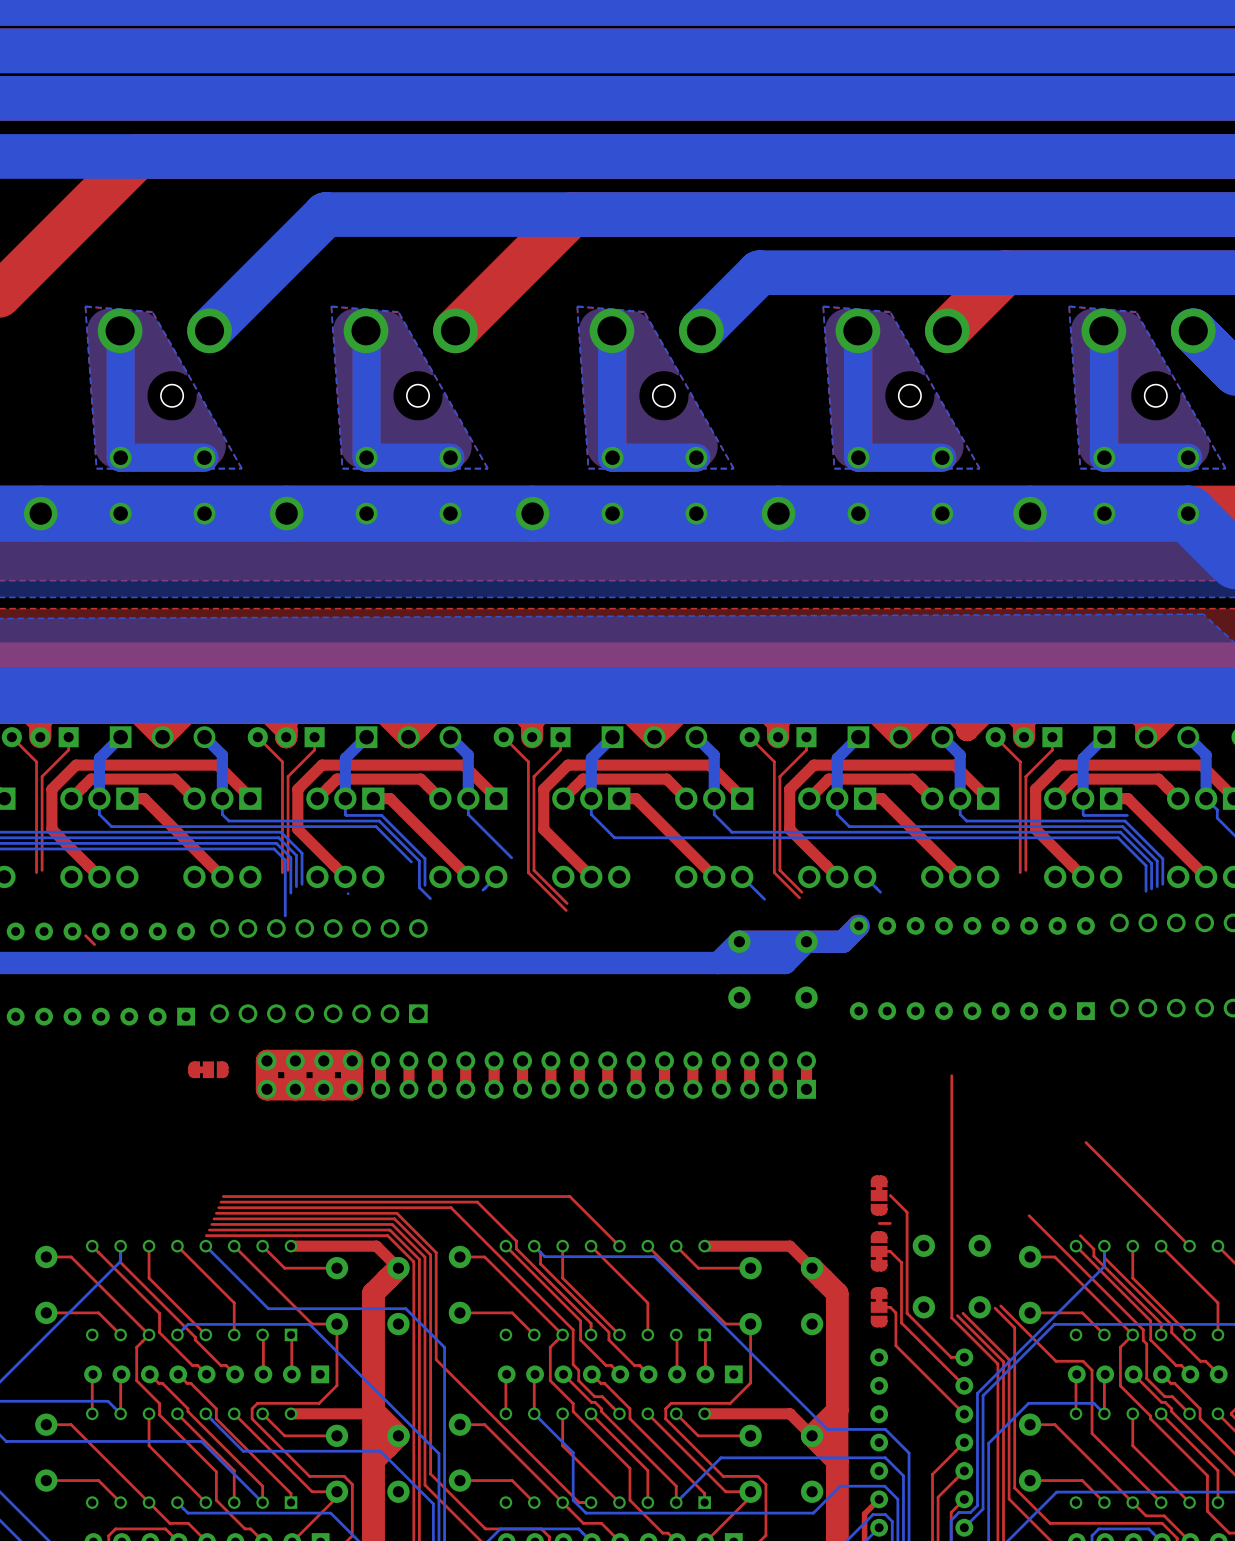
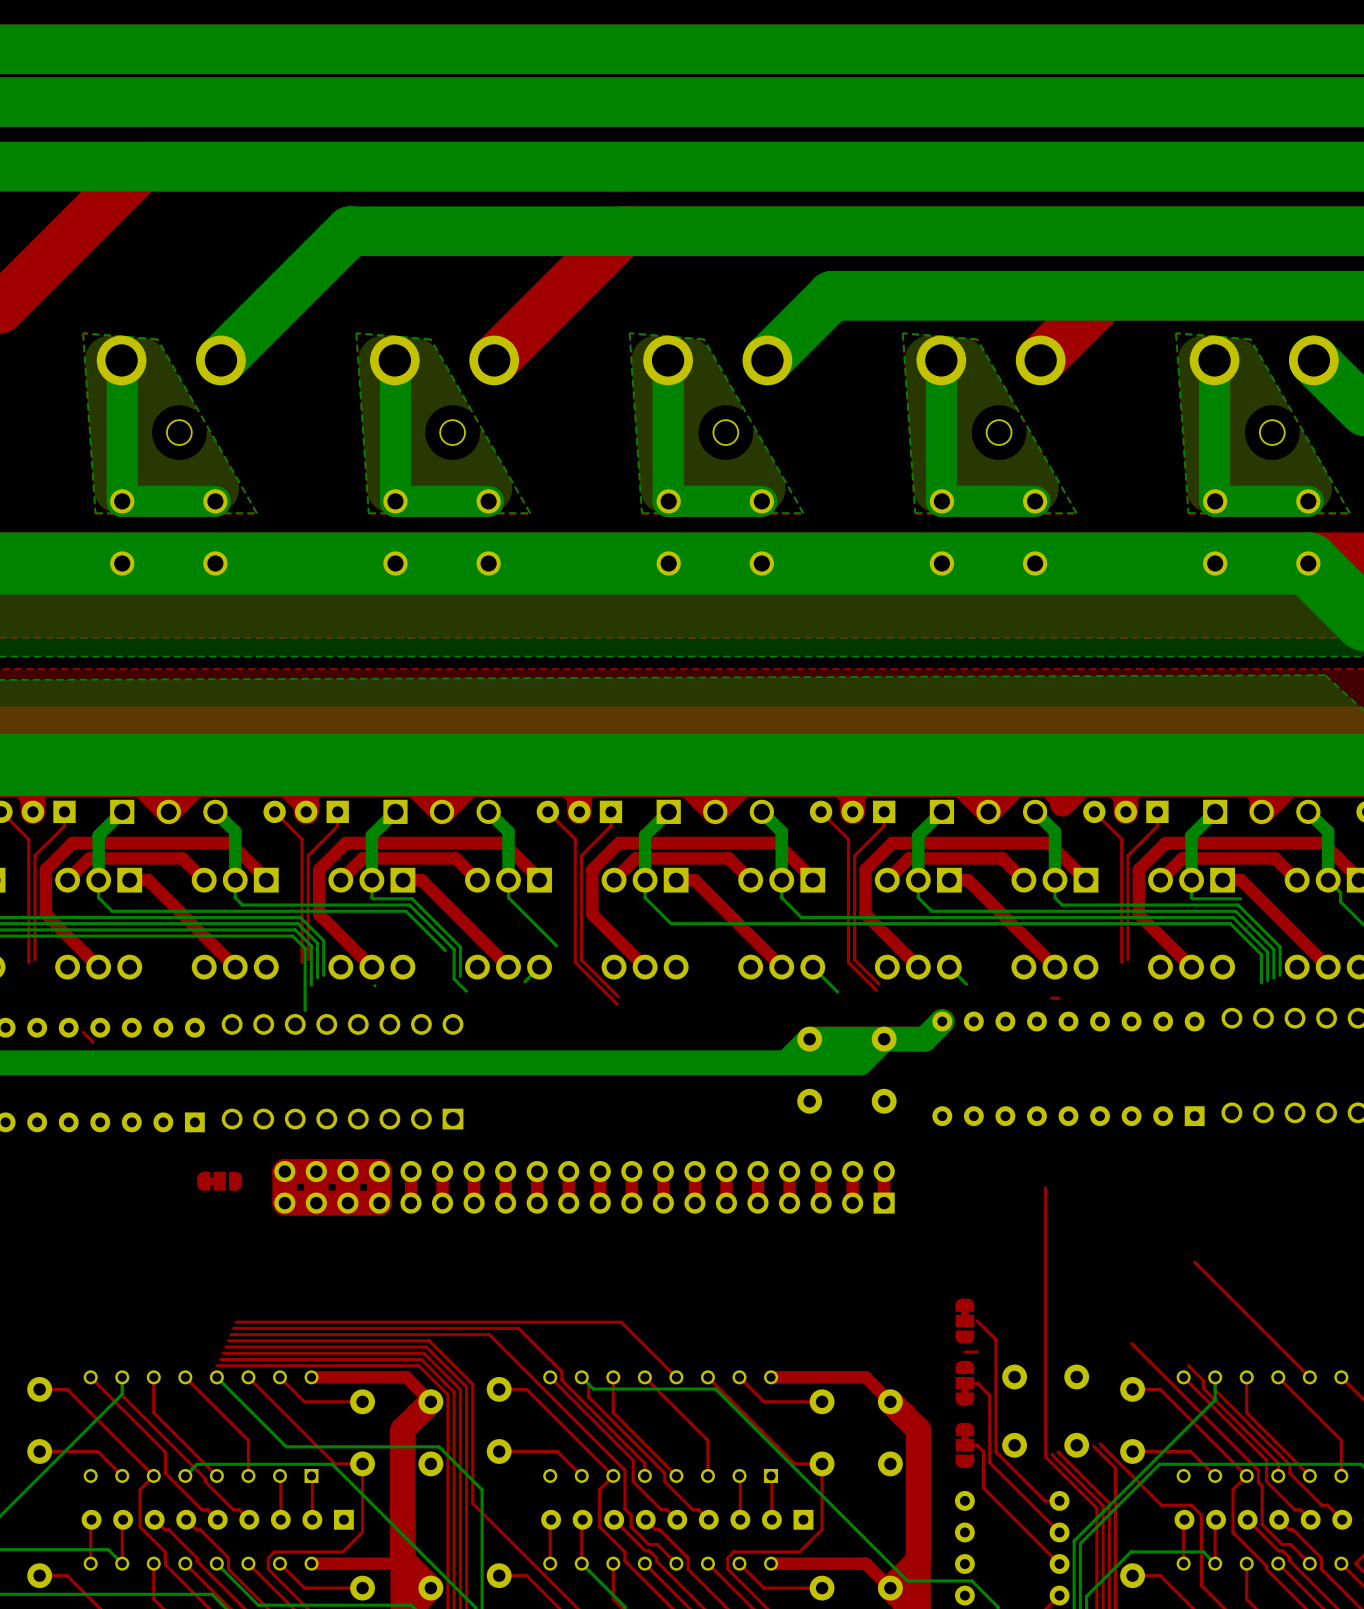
via: (40, 513) -> none
via: (286, 513) -> none
via: (532, 513) -> none
via: (778, 513) -> none
via: (1030, 513) -> none
top track: none -> (1059, 998) (1051, 998)

